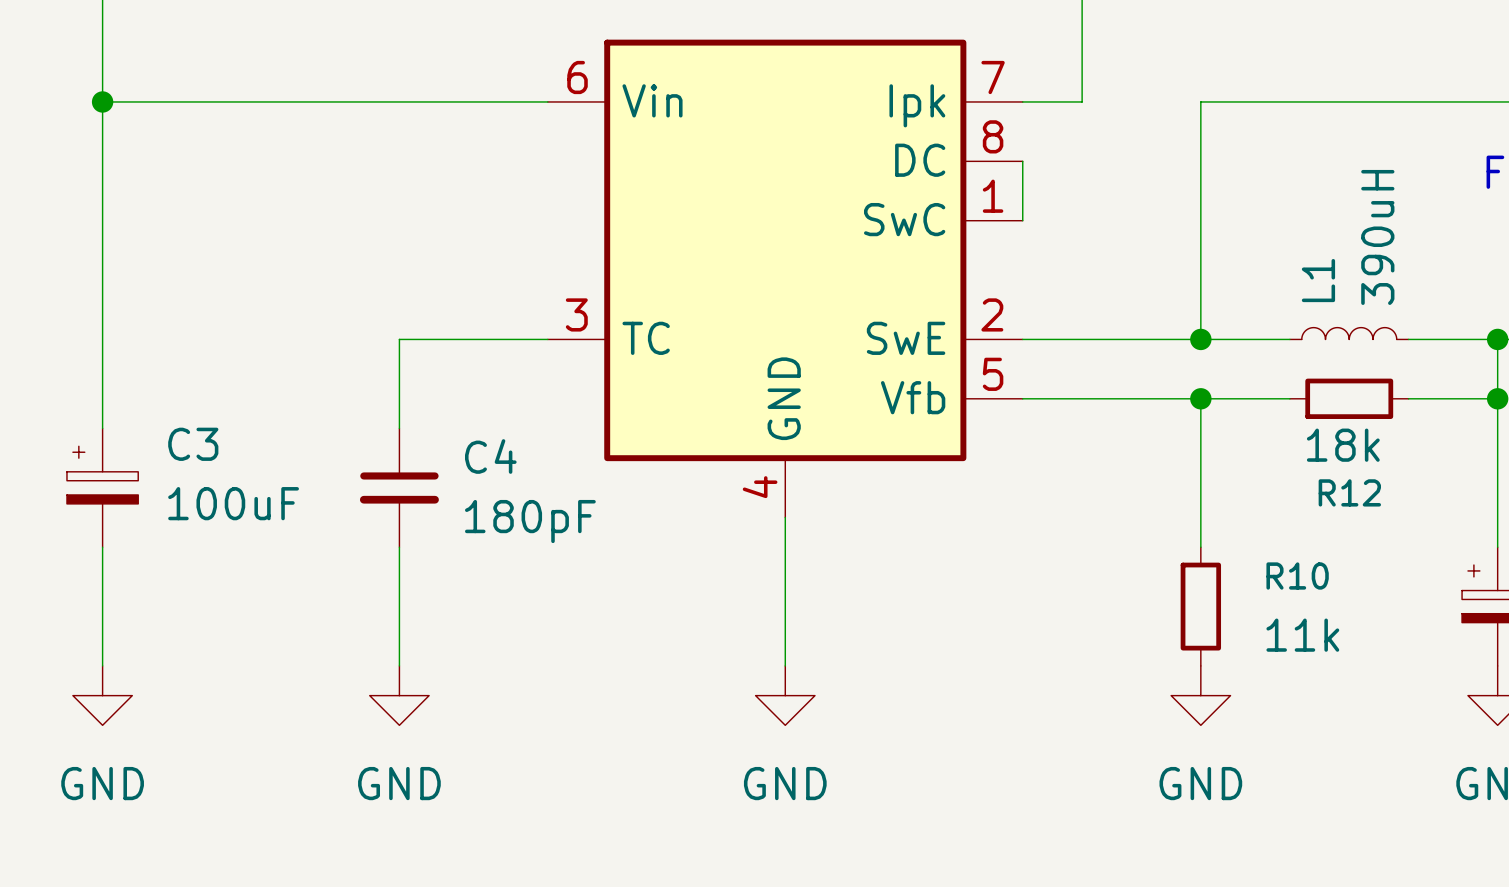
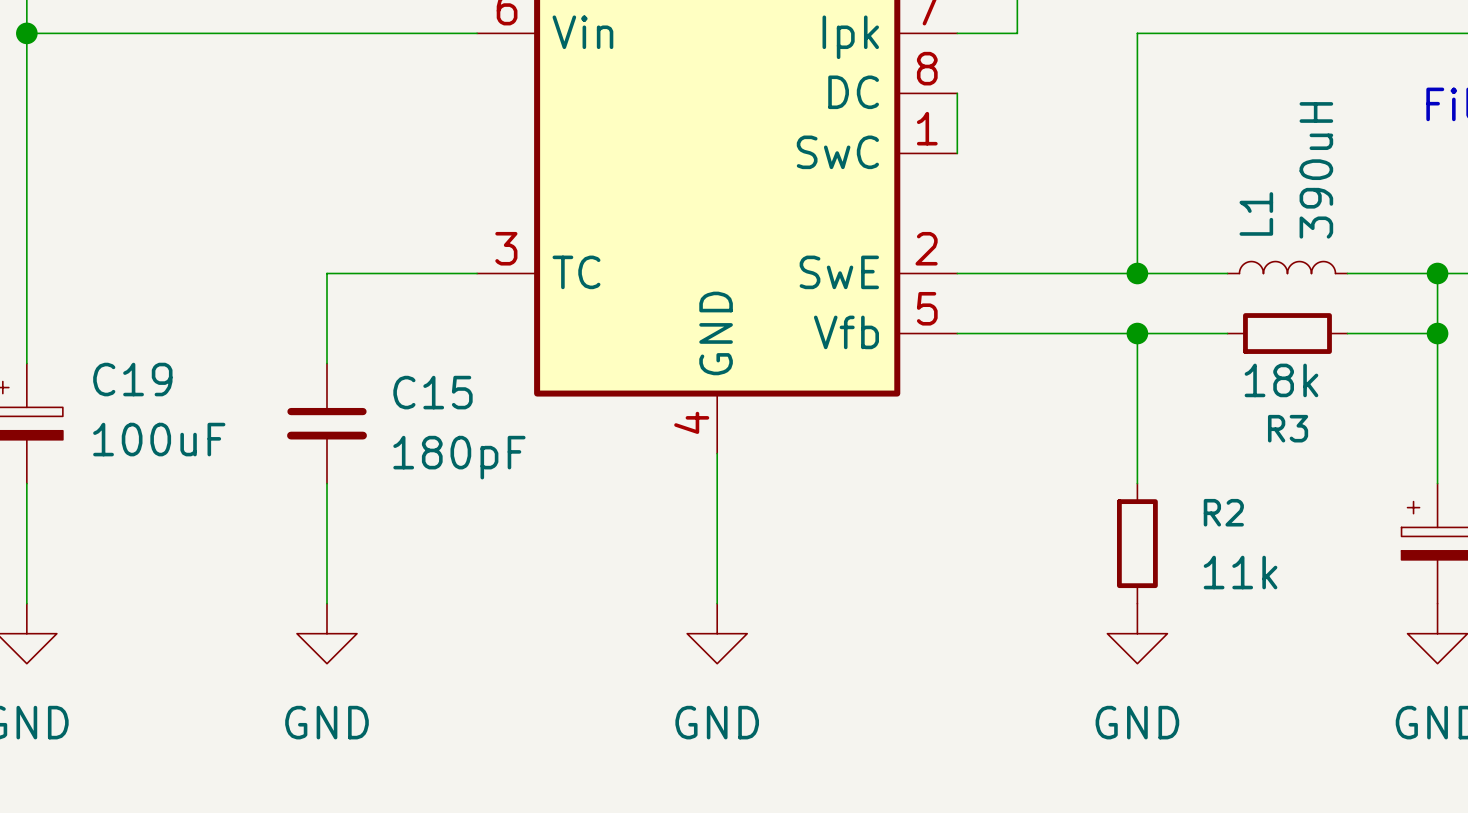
C3 name: C3 (193, 444) -> C19 (132, 379)
C4 name: C4 (490, 456) -> C15 (432, 392)
R12 name: R12 (1349, 492) -> R3 (1288, 428)
R10 name: R10 (1297, 576) -> R2 (1223, 512)

